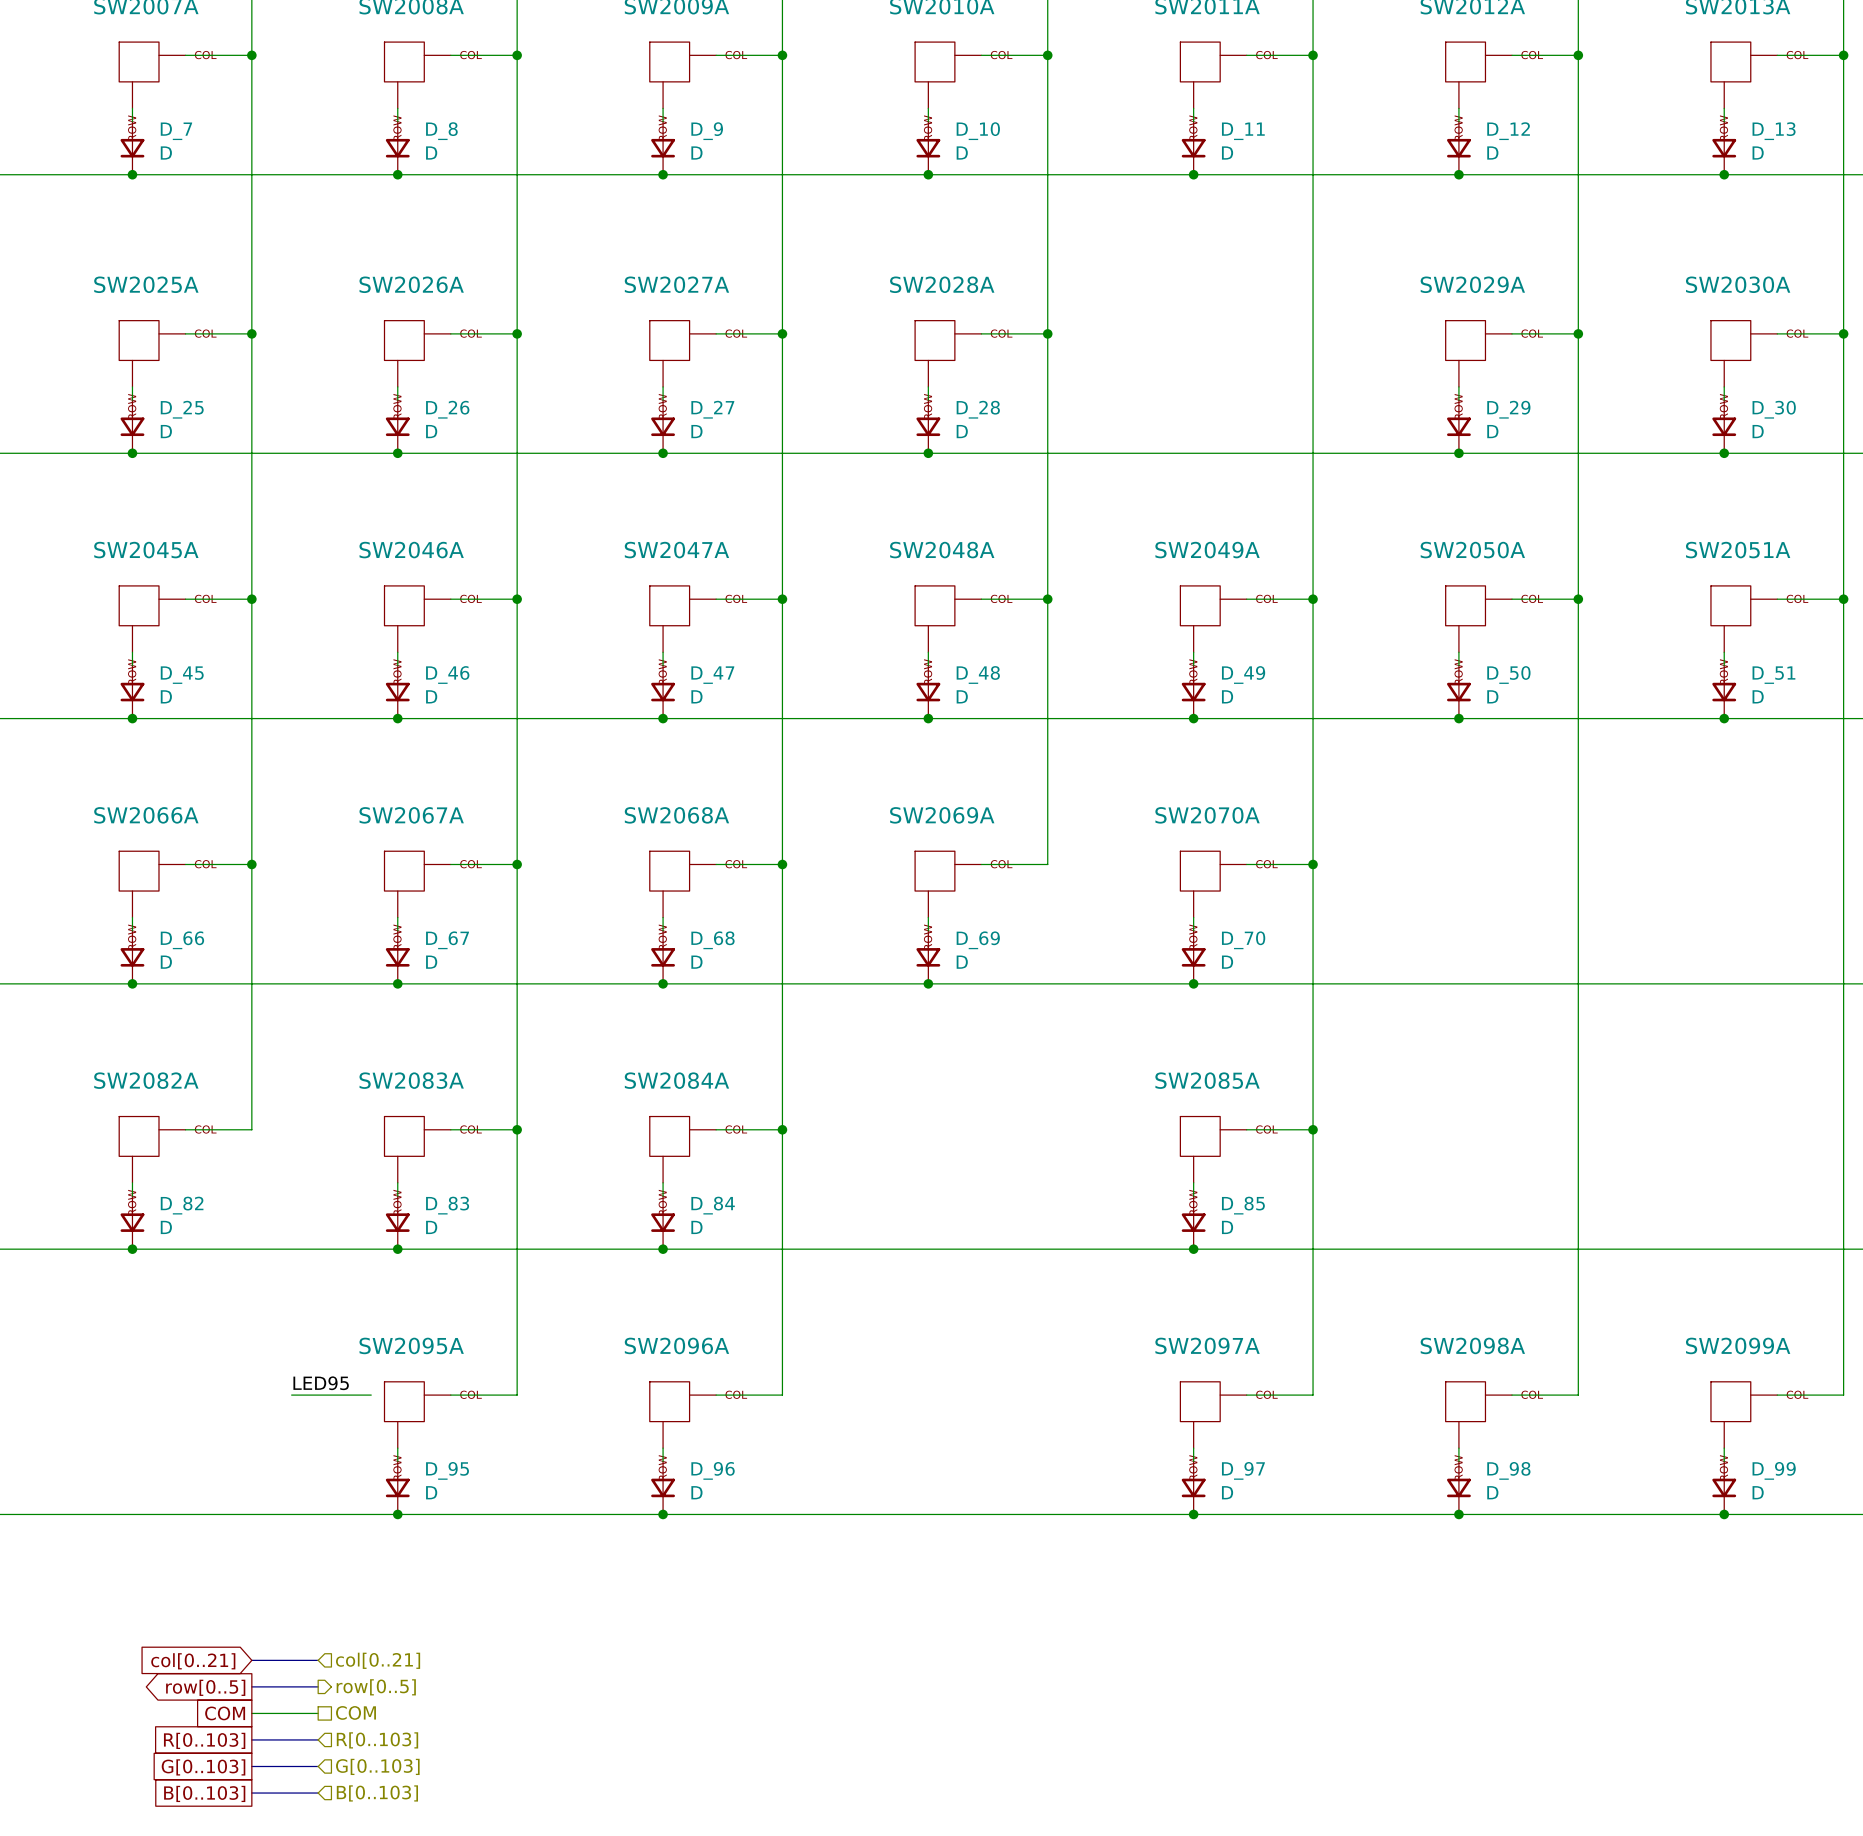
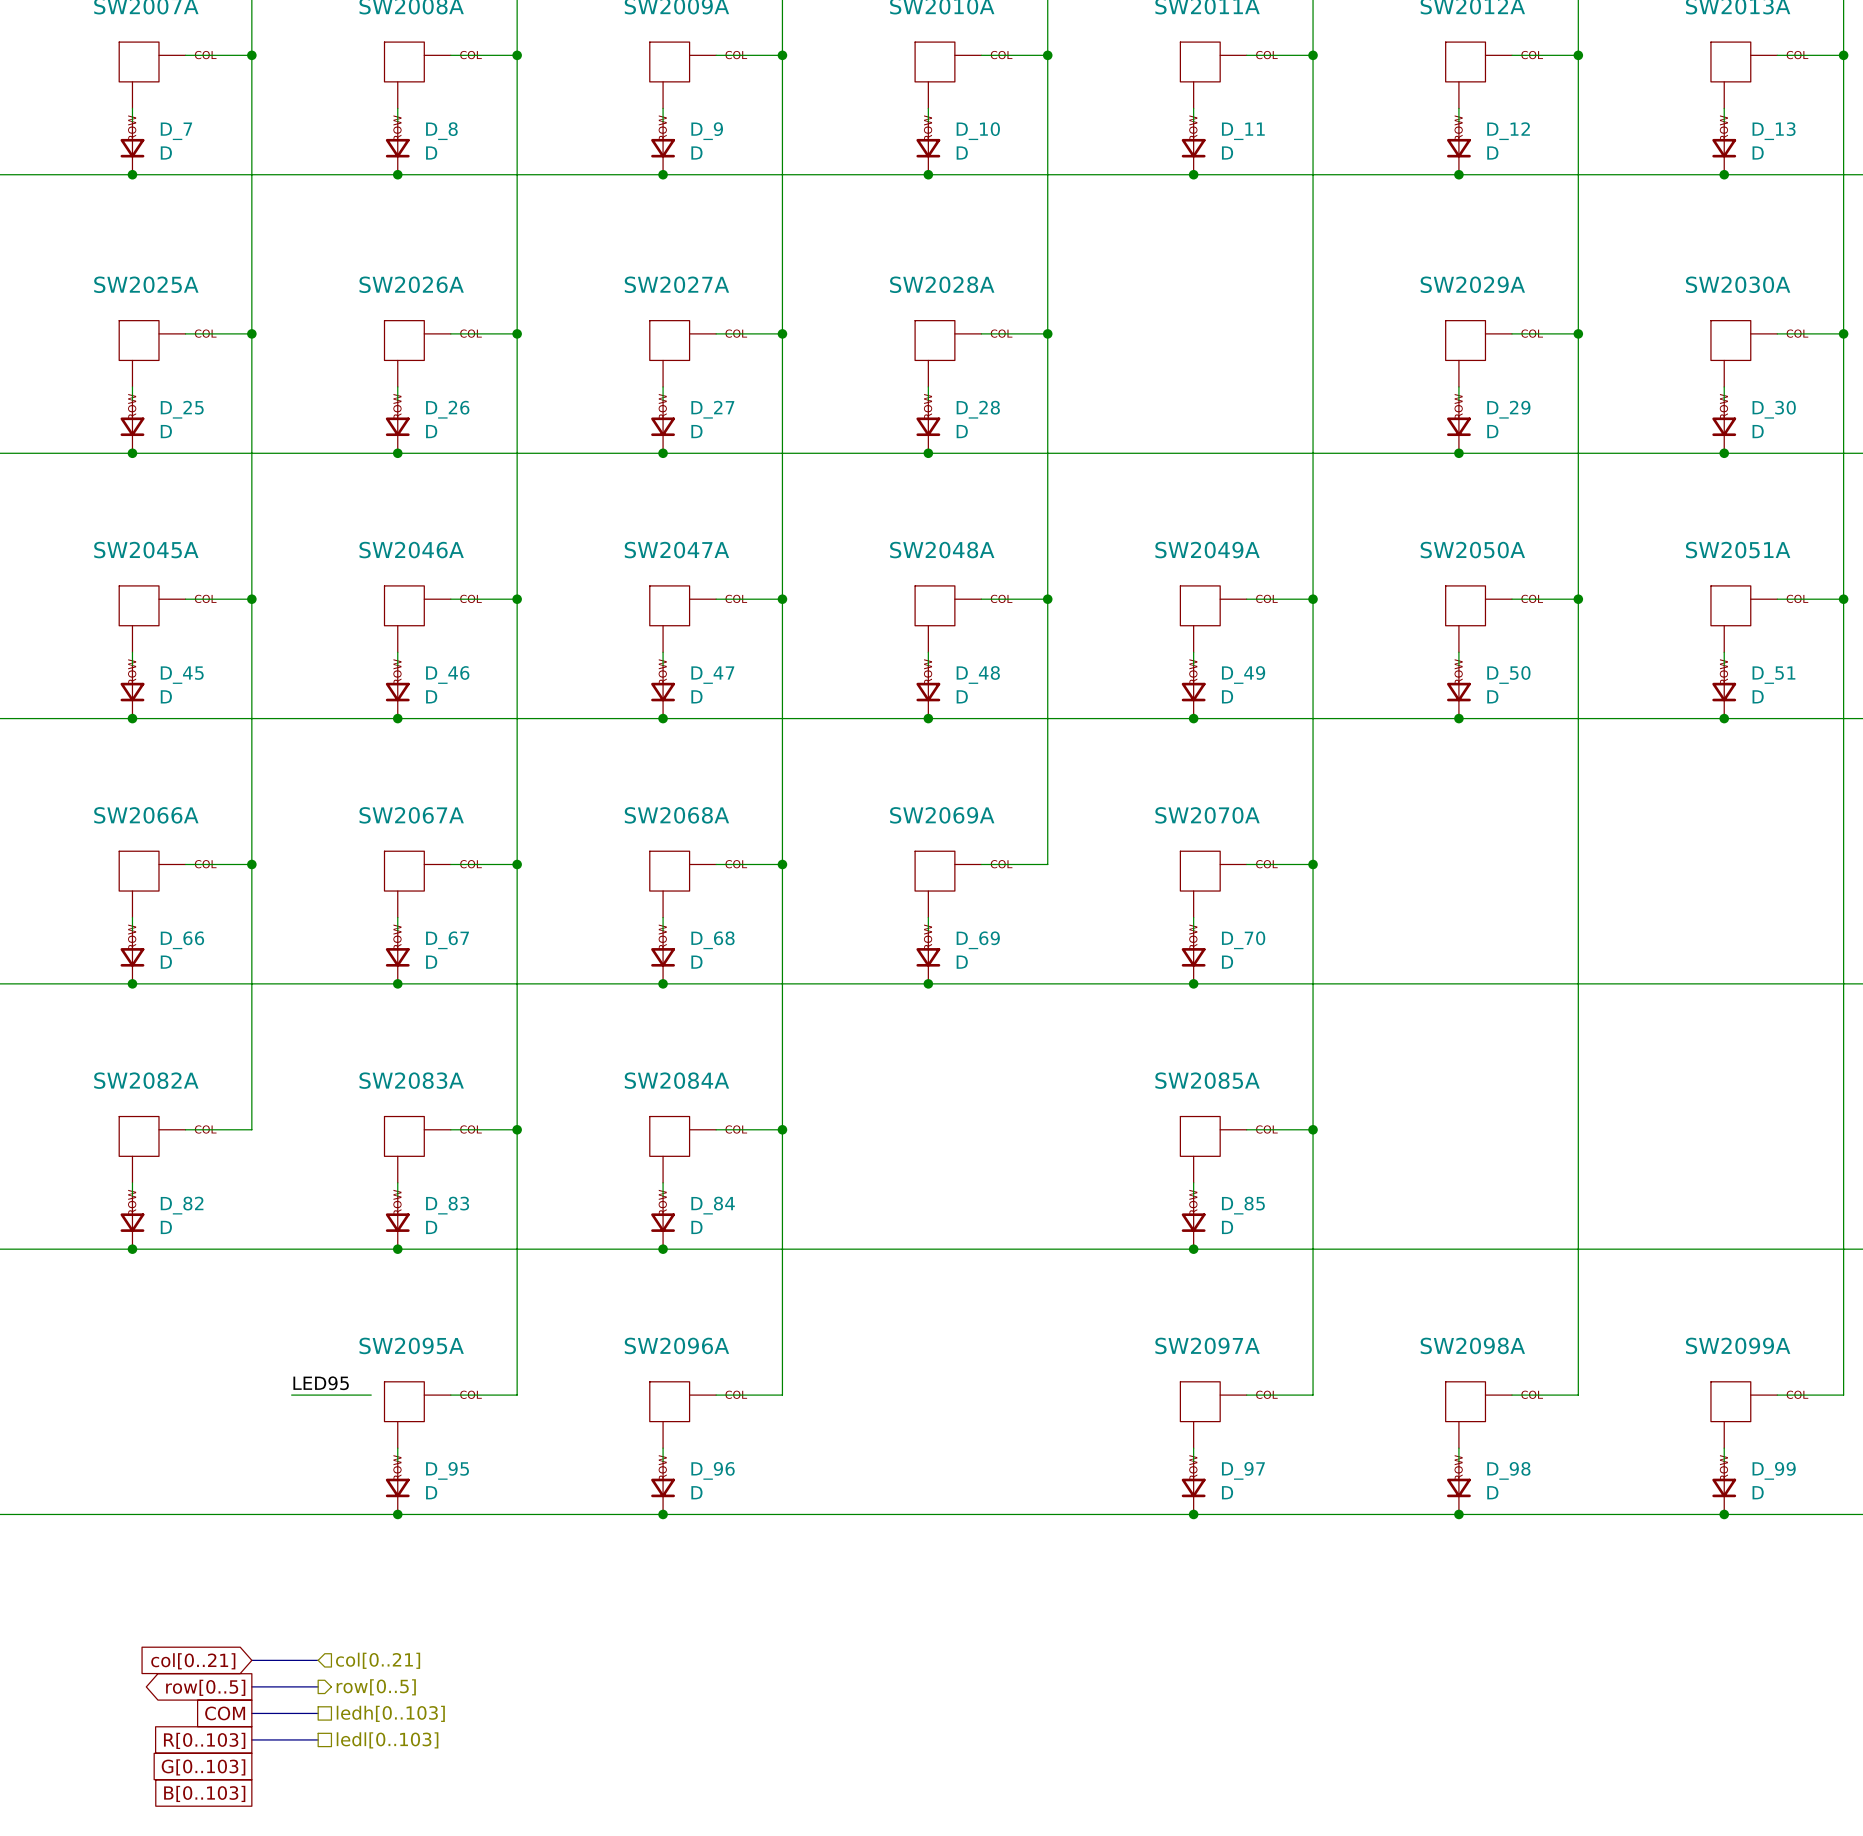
hierarchical label: COM (356, 1712) -> ledh[0..103] (390, 1713)
hierarchical label shape: input (377, 1740) -> passive (387, 1740)
hierarchical label: R[0..103] (377, 1740) -> ledl[0..103] (387, 1740)
bus: (251, 1766) (318, 1766) -> (251, 1713) (318, 1713)
hierarchical label: G[0..103] (377, 1766) -> none
bus: (251, 1793) (318, 1793) -> none
hierarchical label: B[0..103] (377, 1793) -> none

